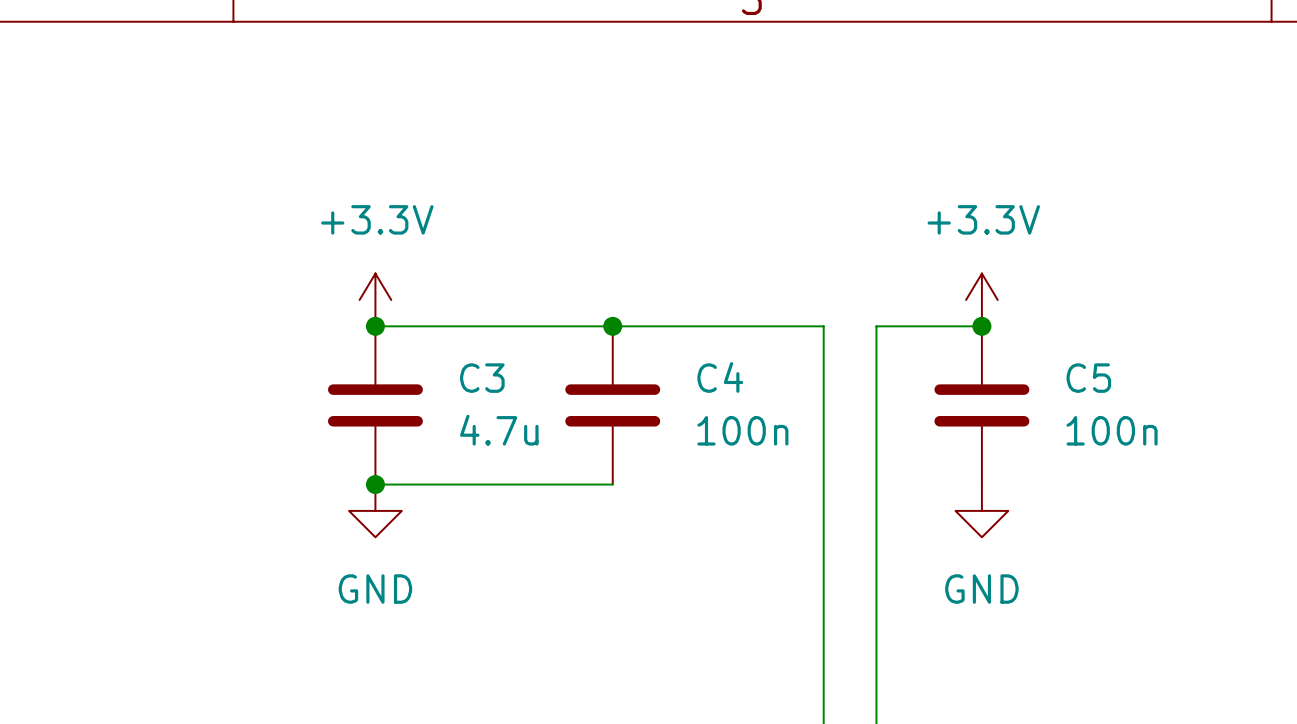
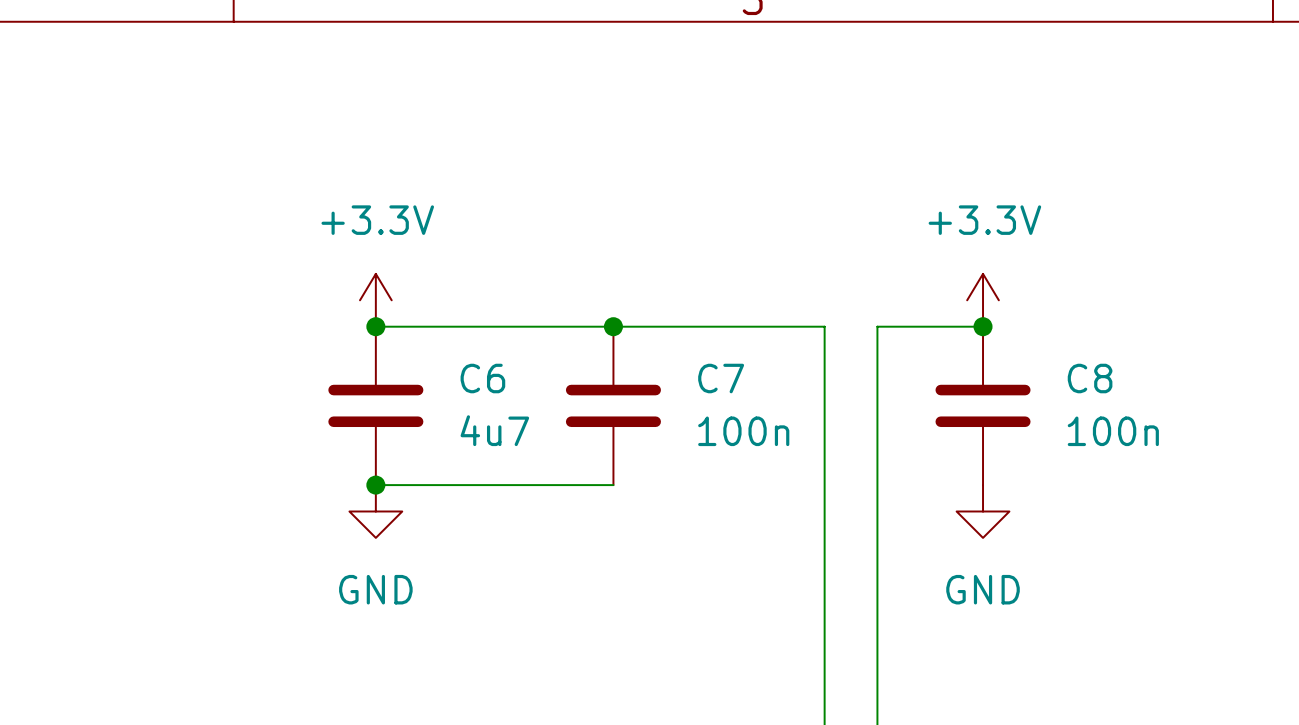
C4 name: C4 (720, 377) -> C7 (721, 378)
C3 name: C3 (482, 378) -> C6 (482, 378)
C5 name: C5 (1088, 378) -> C8 (1090, 378)
C3 value: 4.7u (499, 430) -> 4u7 (494, 430)

